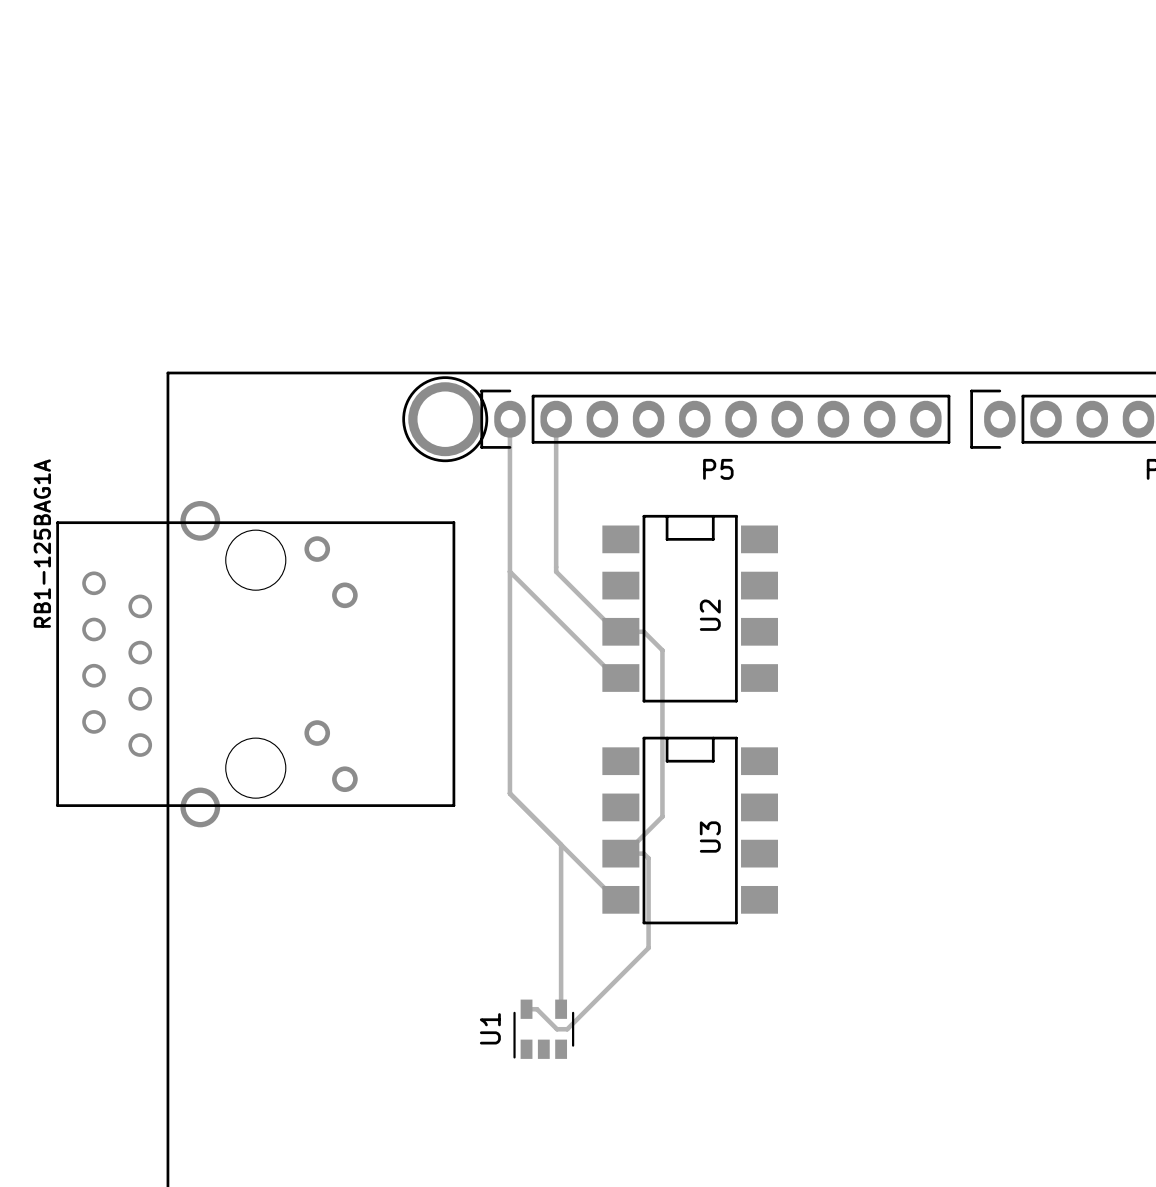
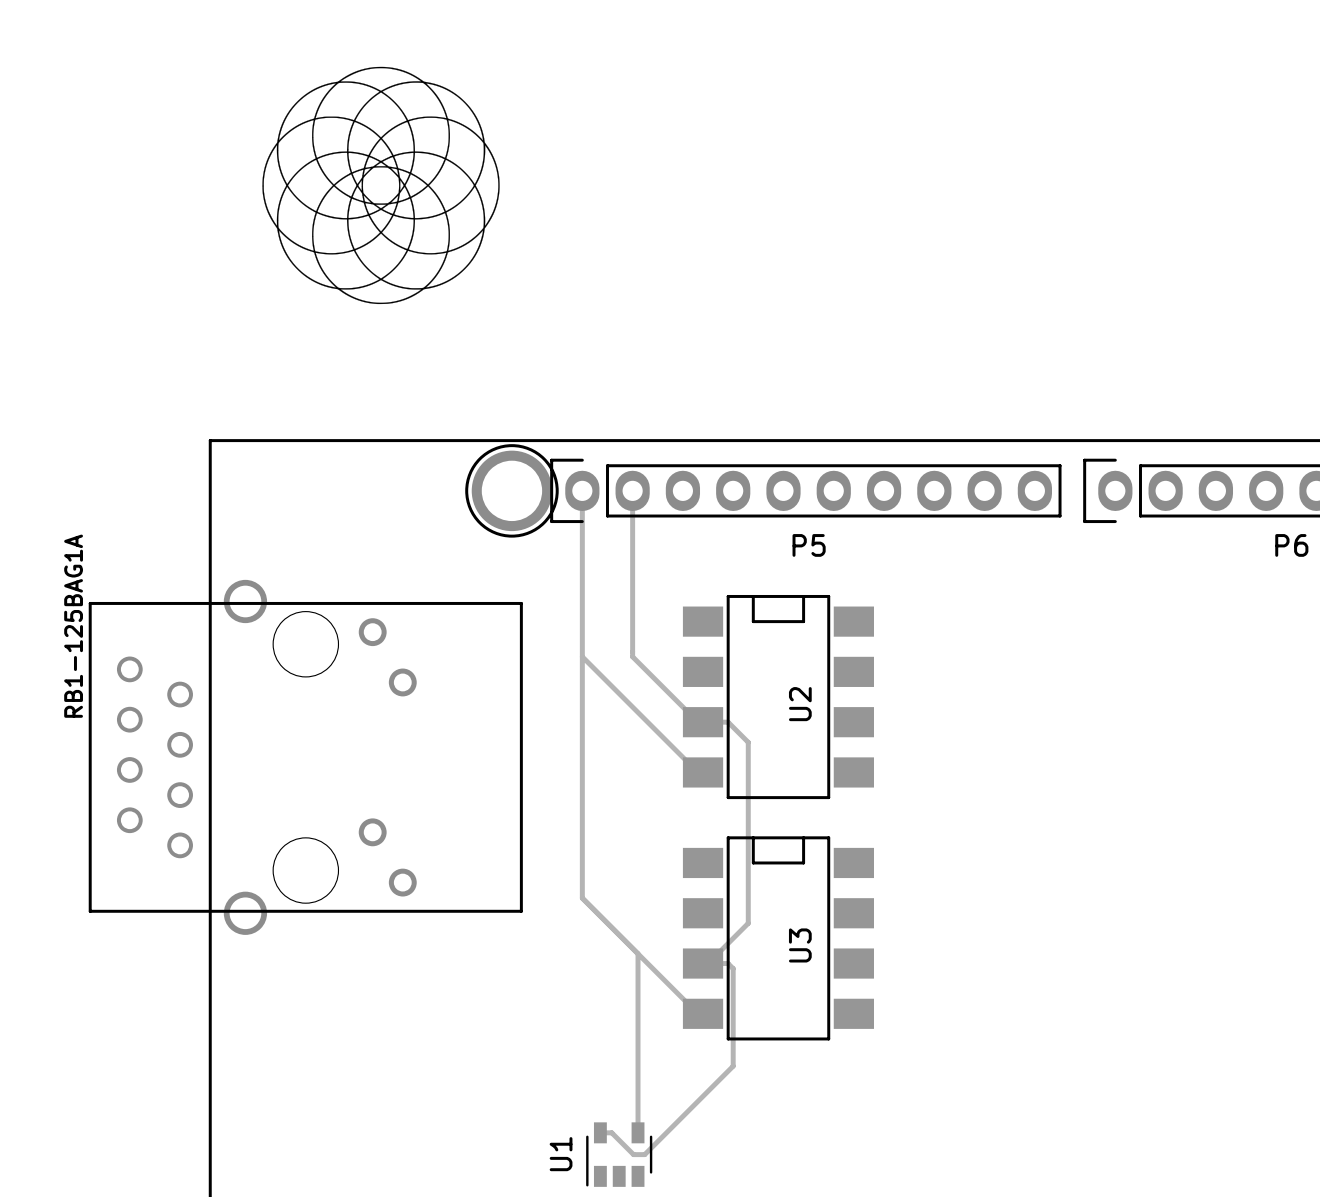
drawing: none -> [262, 66, 500, 305]

